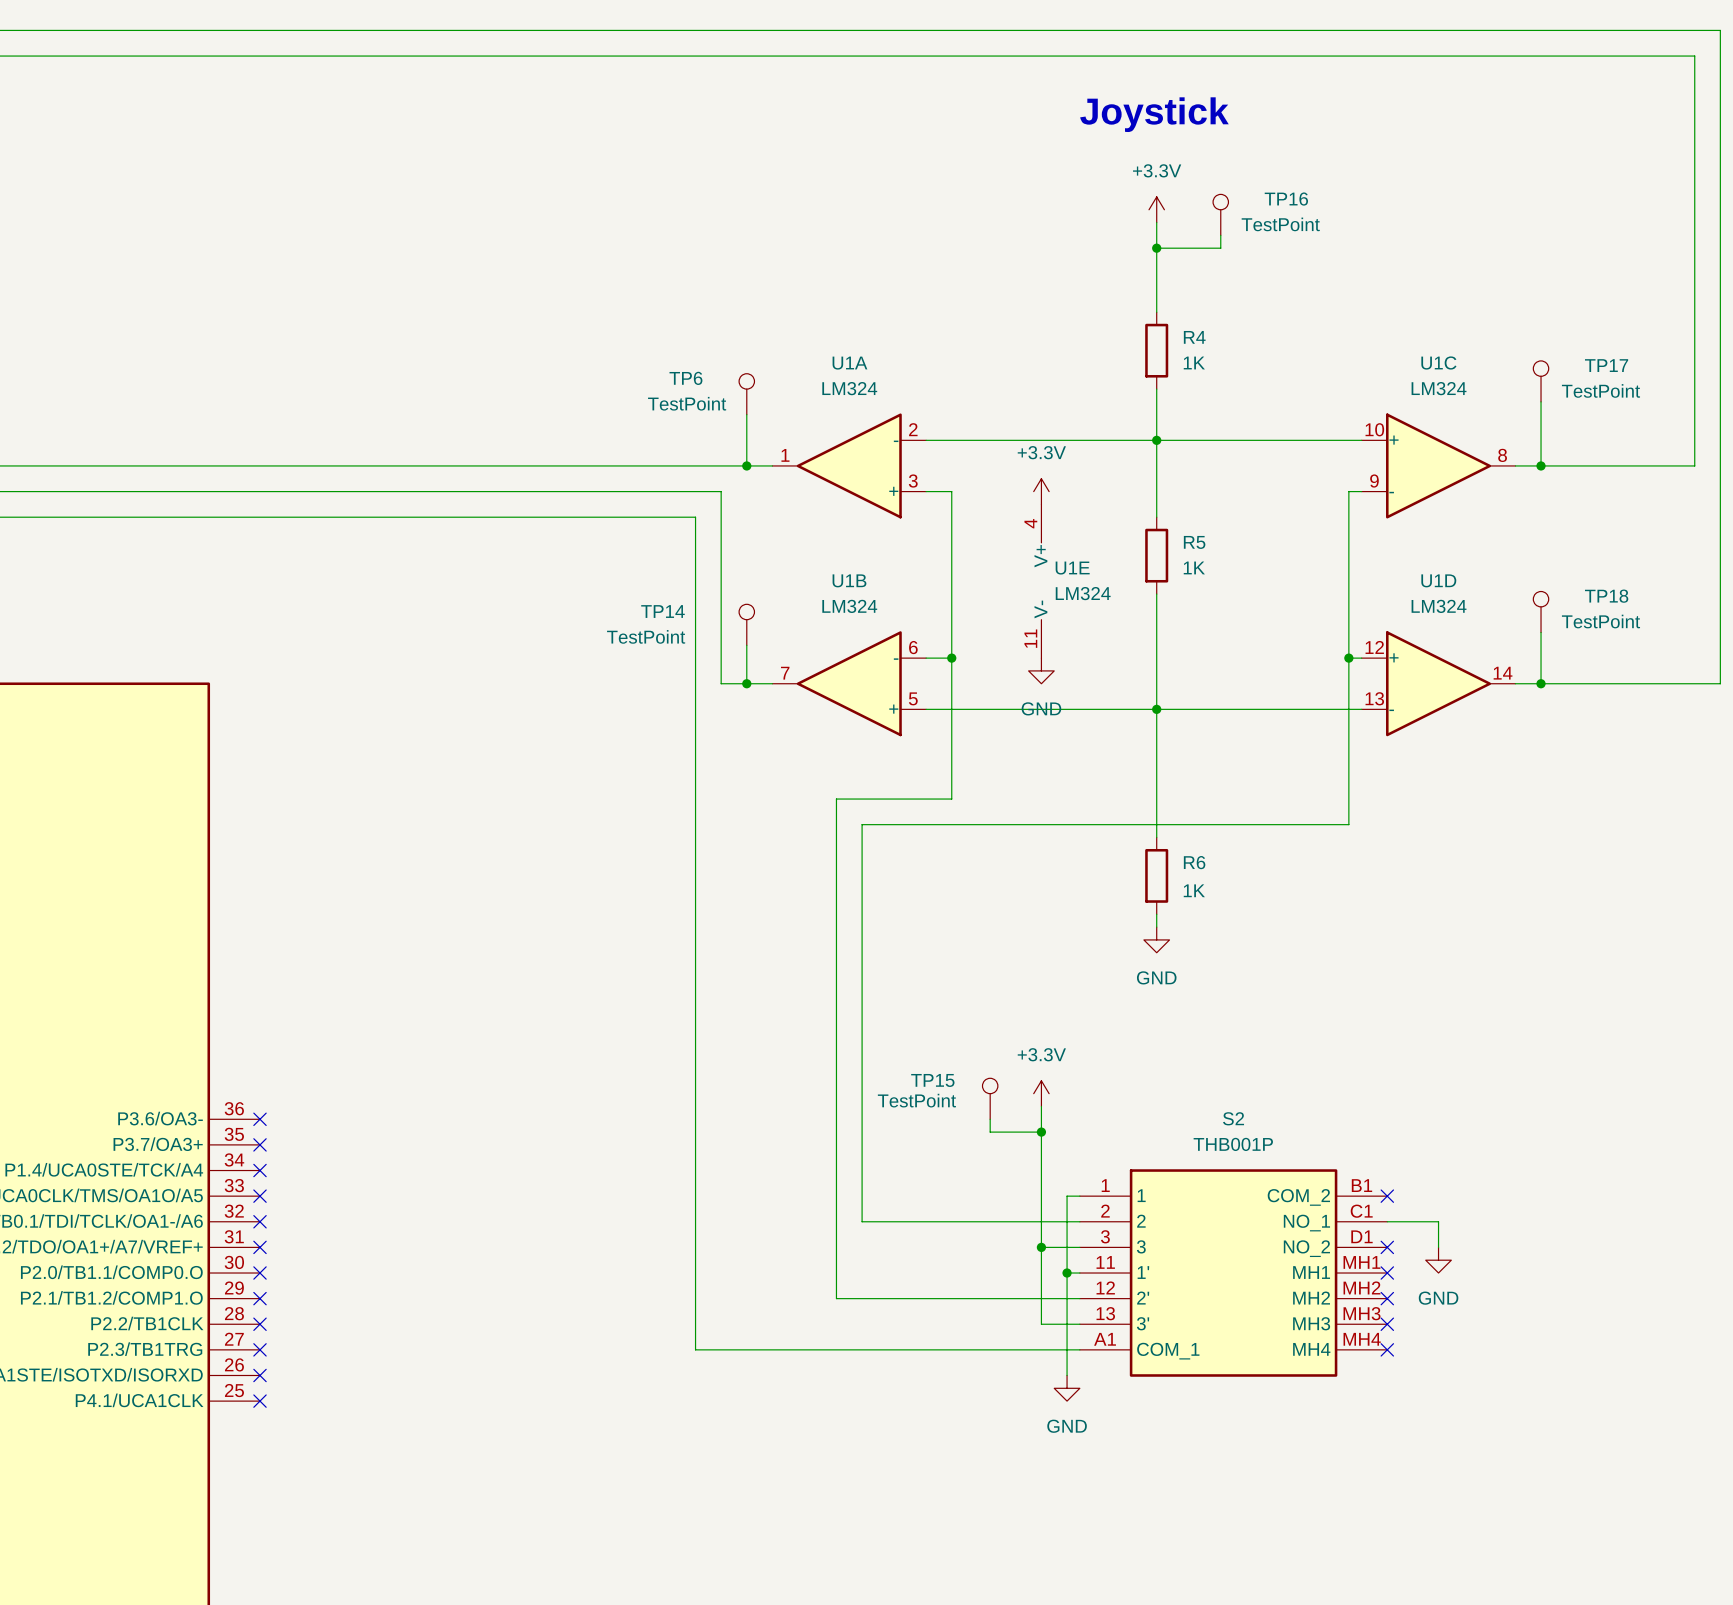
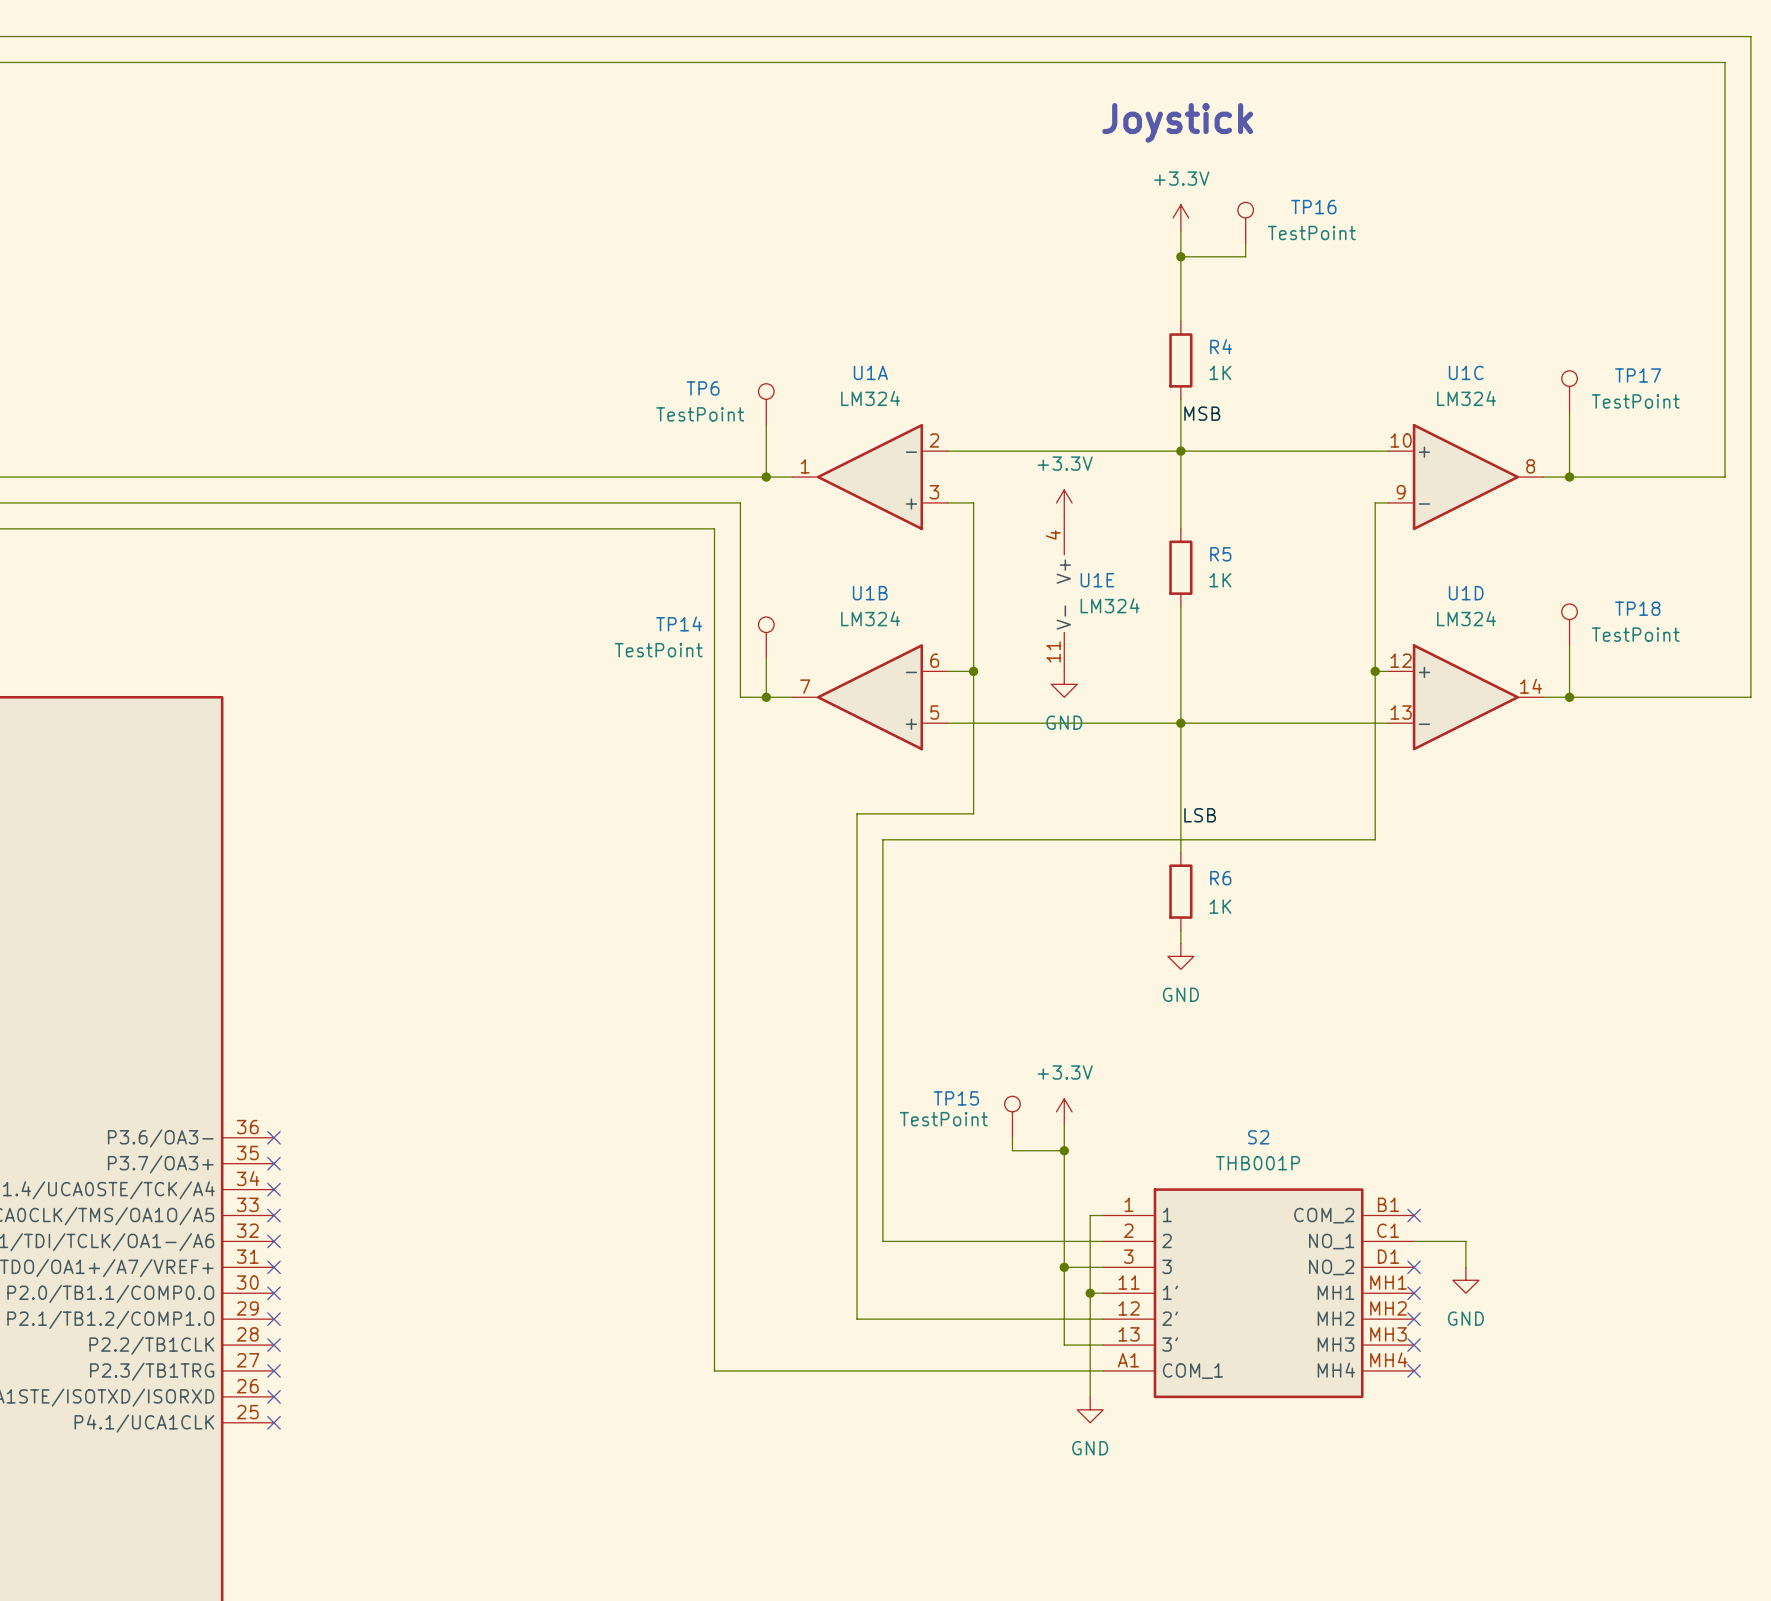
label: none -> MSB (1202, 413)
label: none -> LSB (1200, 815)

